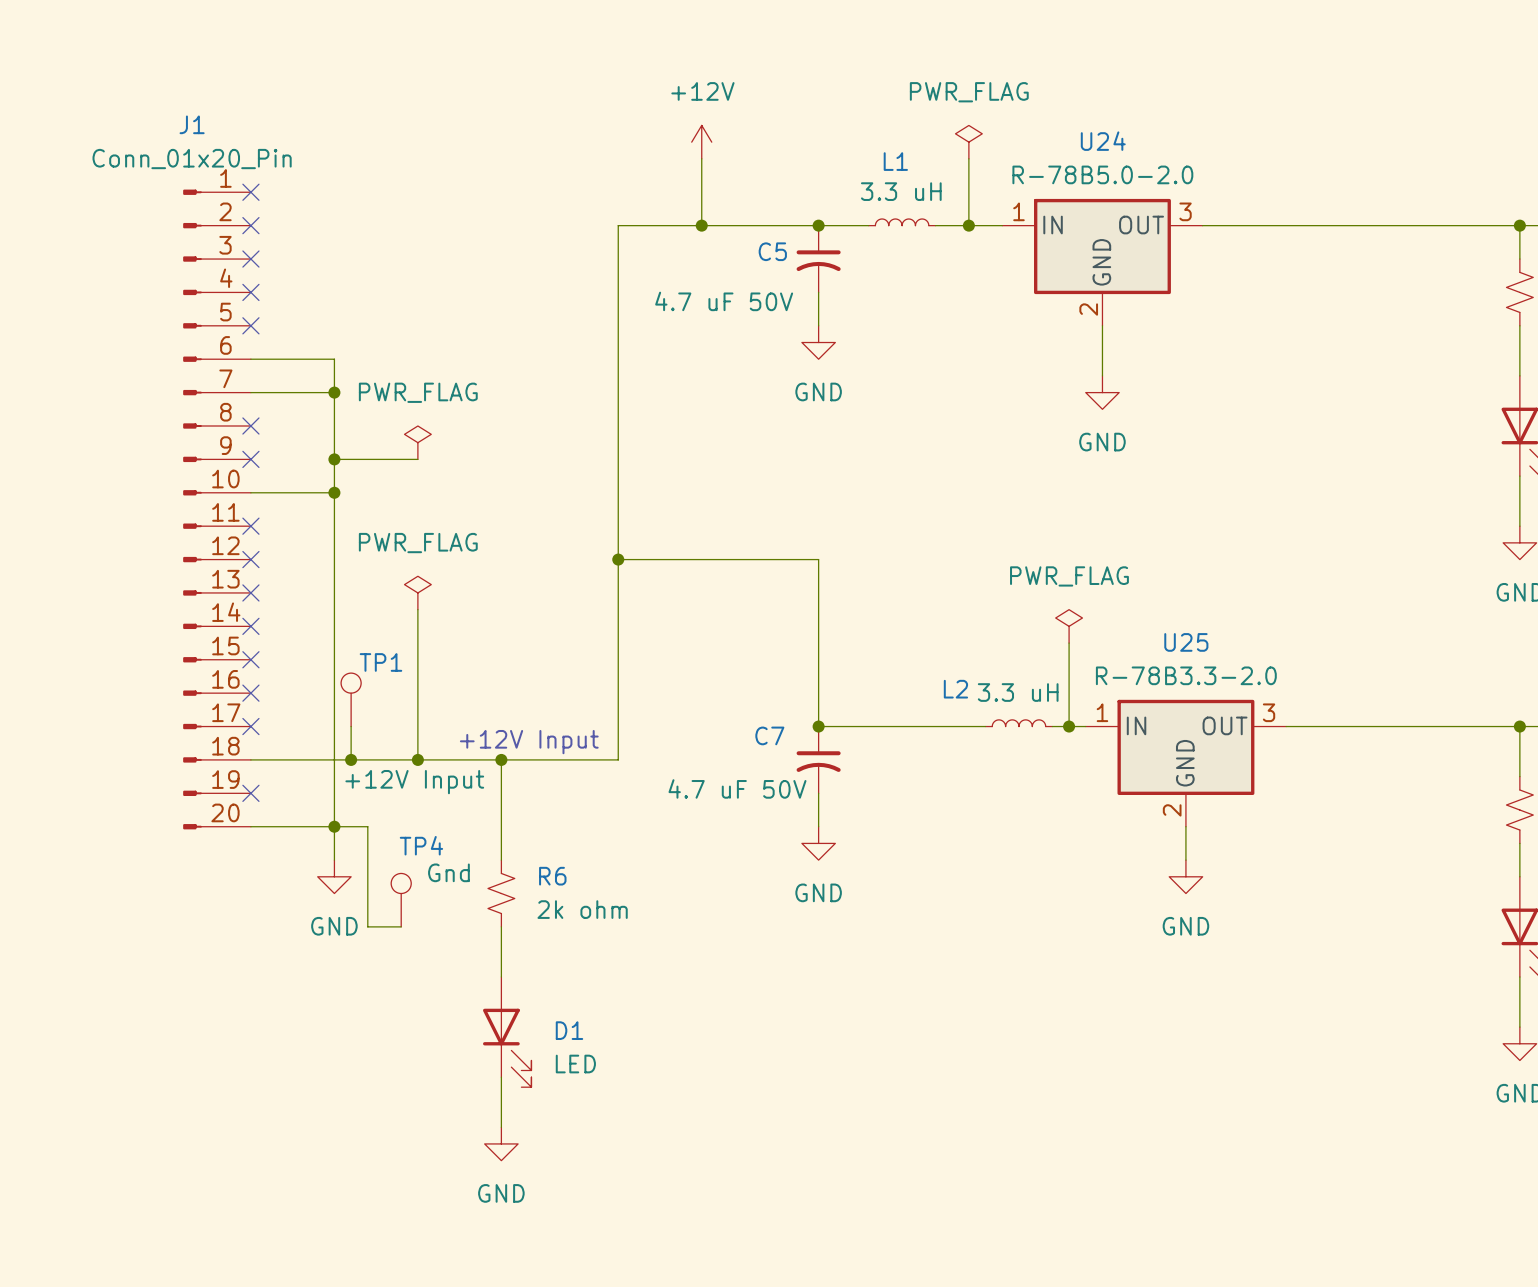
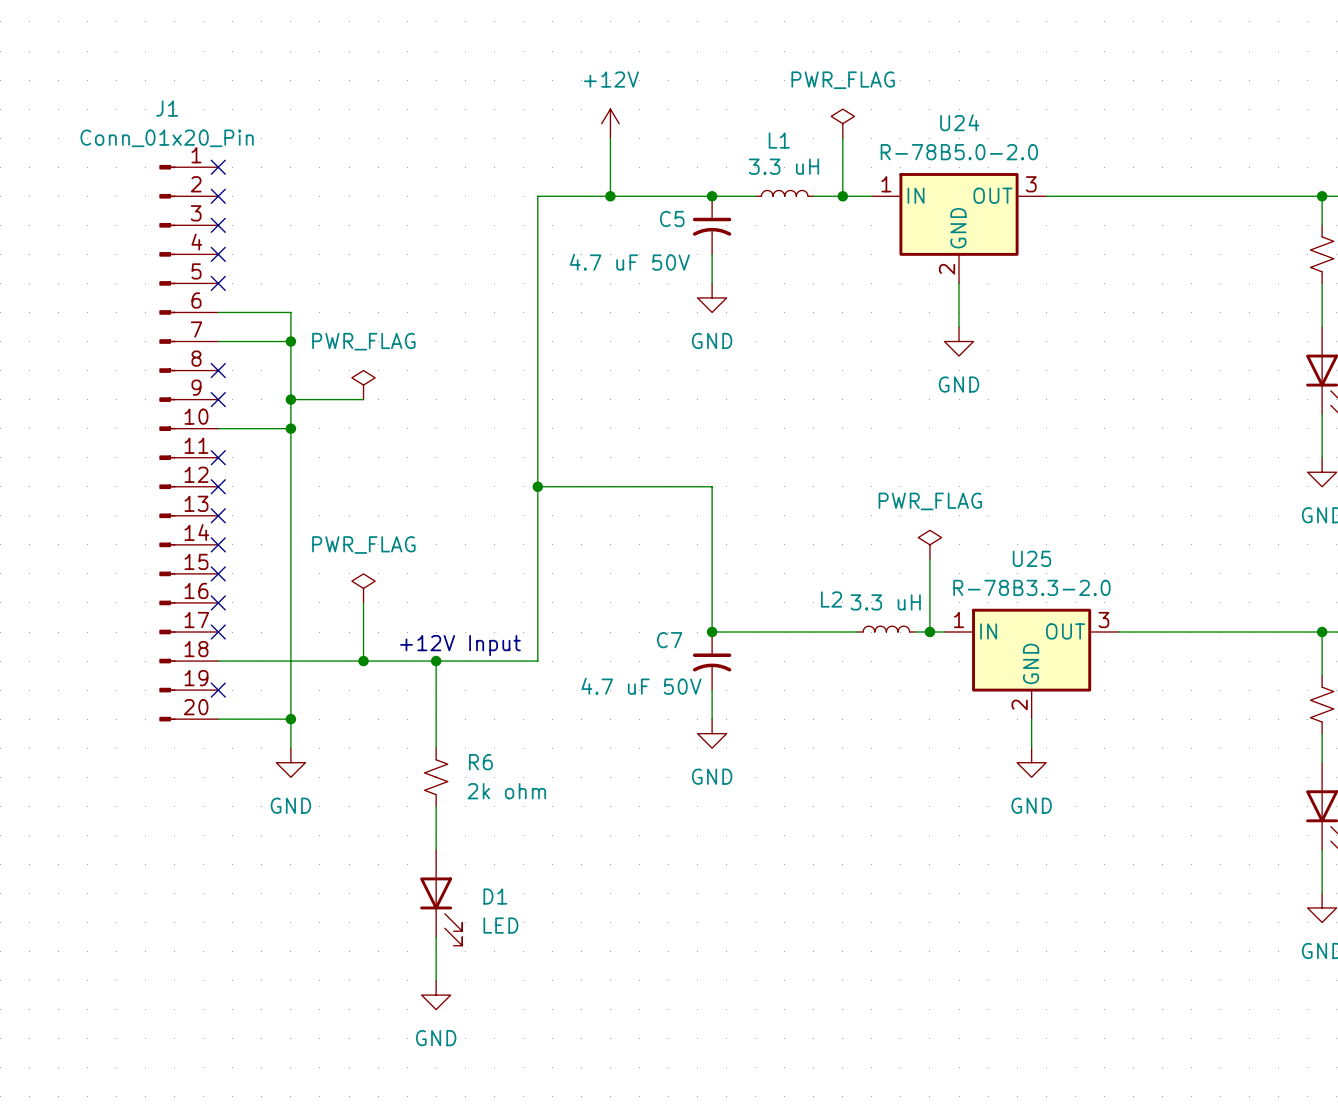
power symbol position: PWR_FLAG (417, 592) -> PWR_FLAG (363, 588)
wire: (417, 609) (417, 693) -> none
TP1: +12V Input (351, 699) -> none
wire: (351, 726) (351, 759) -> none
junction: (351, 759) -> none
wire: (334, 826) (367, 826) (367, 926) (401, 926) -> none
TP4: Gnd (401, 900) -> none

